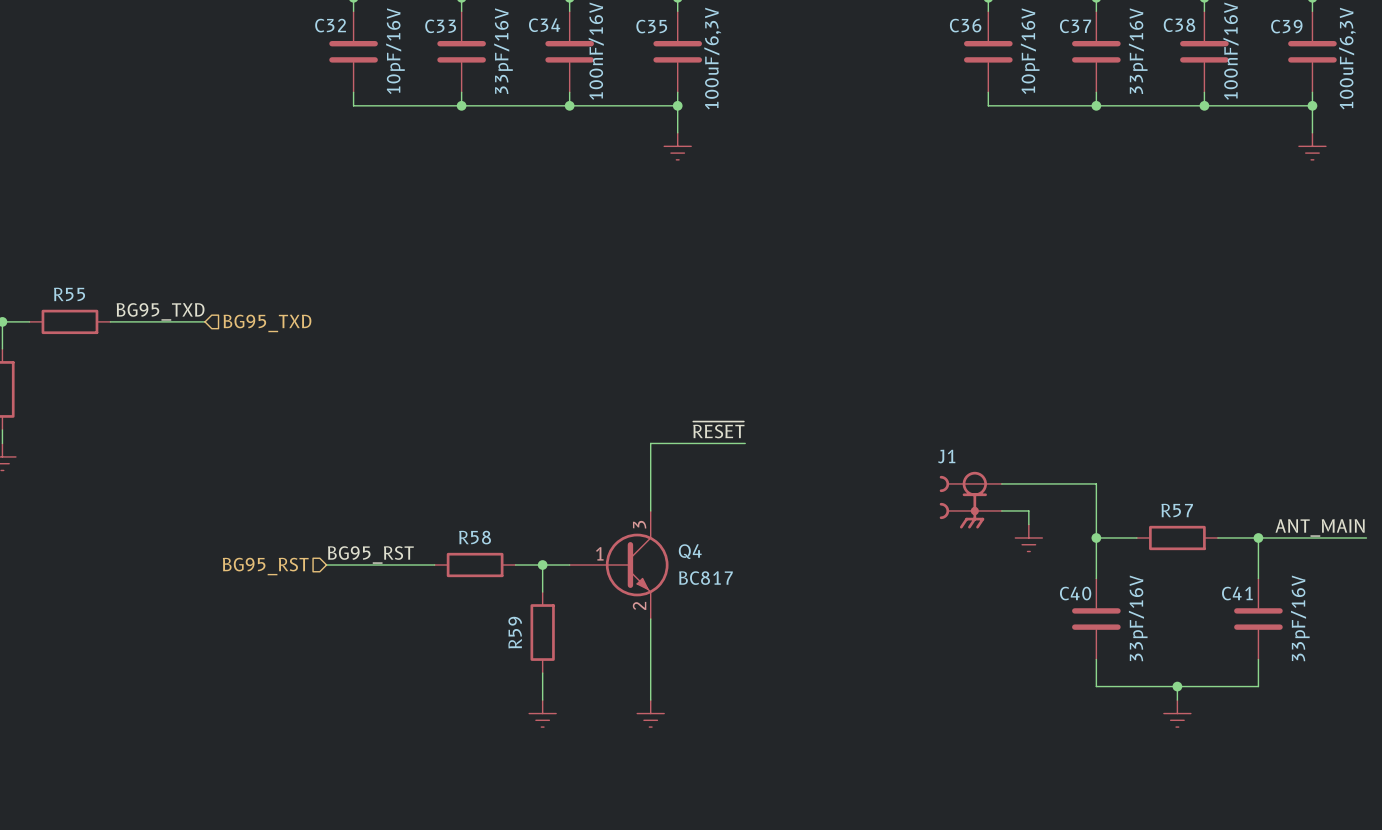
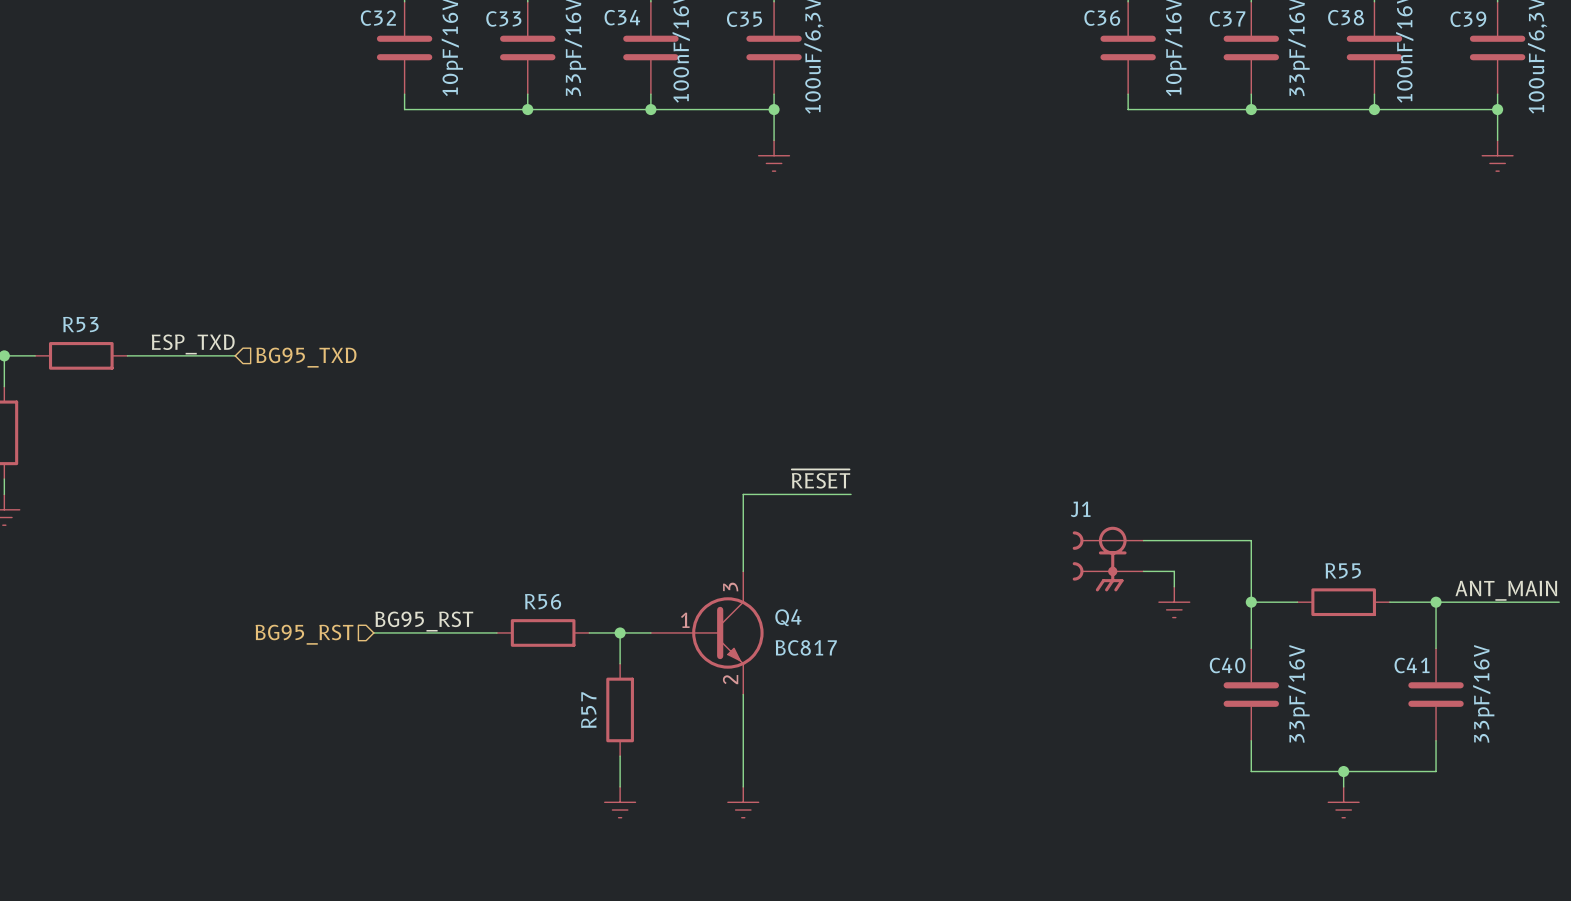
R55 name: R55 (69, 294) -> R53 (80, 324)
label: BG95_TXD (160, 311) -> ESP_TXD (193, 344)
R57 name: R57 (1177, 510) -> R55 (1343, 570)
R58 name: R58 (475, 537) -> R56 (543, 601)
R59 name: R59 (515, 632) -> R57 (588, 710)

